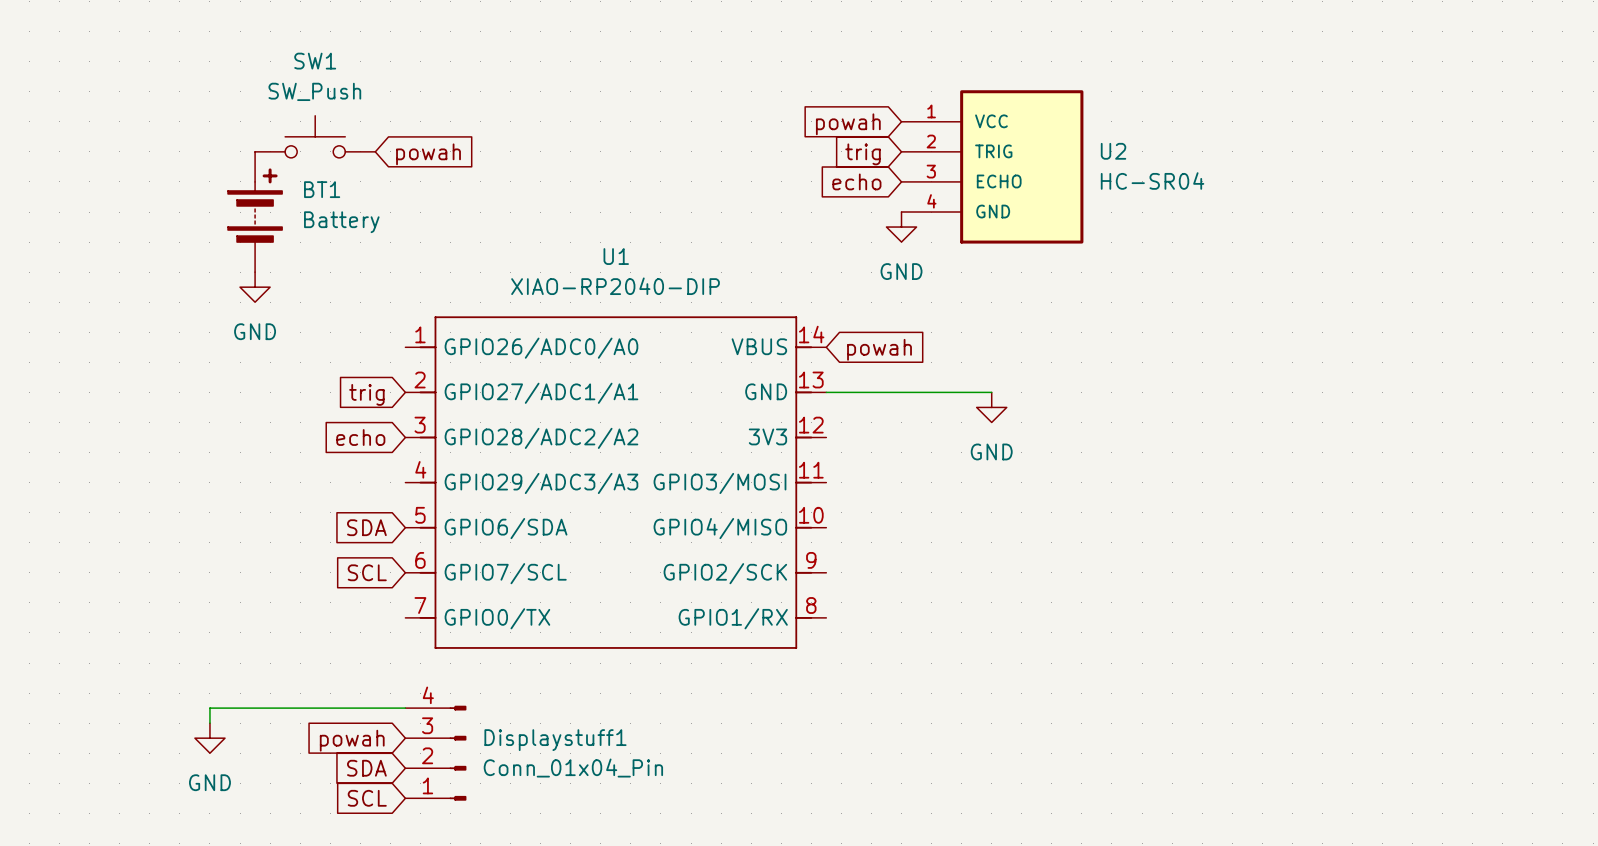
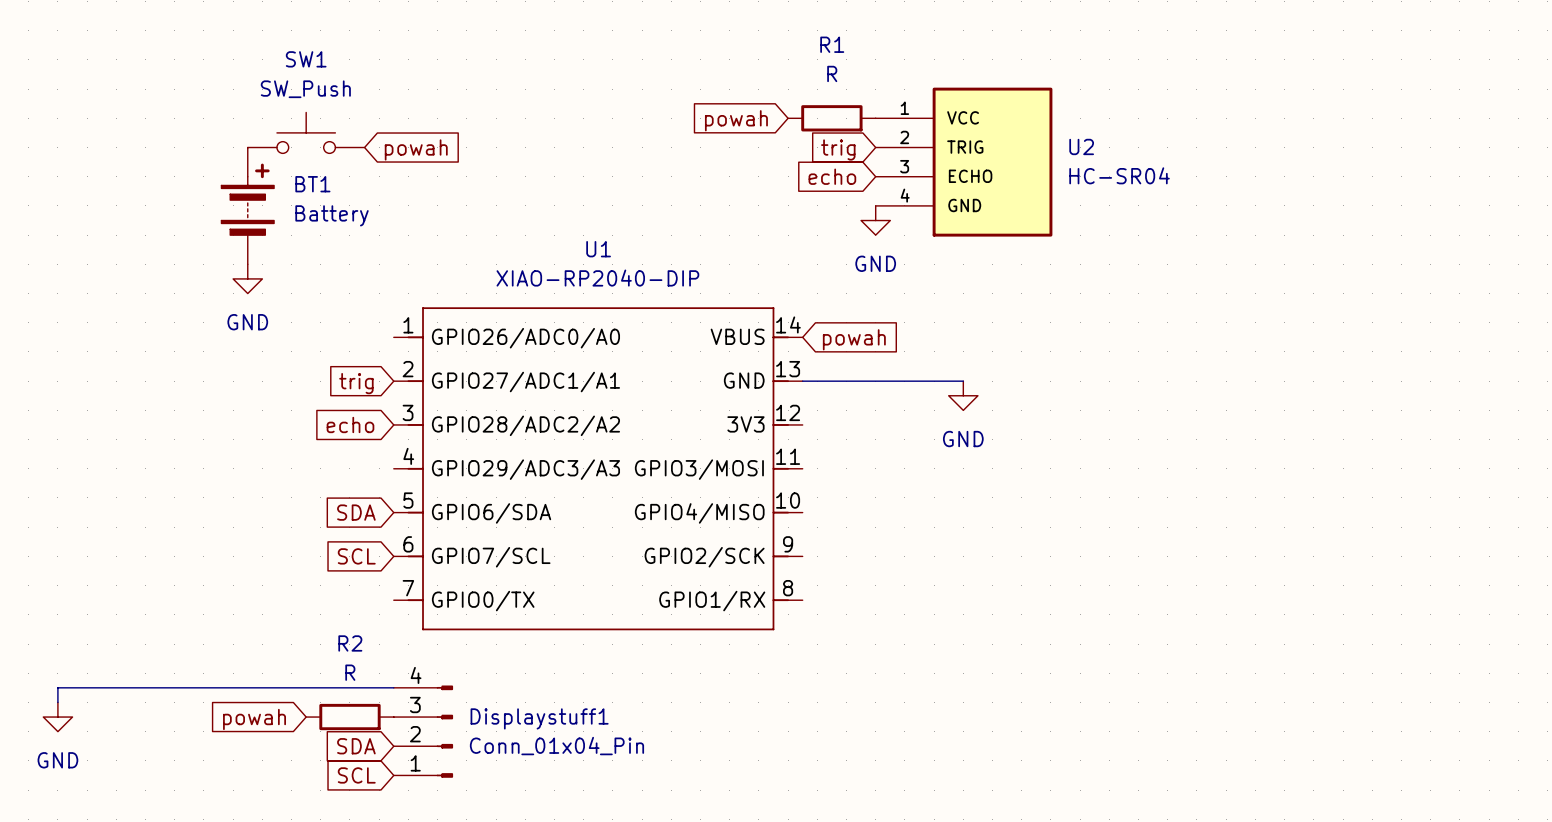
R1: none -> R (831, 118)
global label position: powah (848, 124) -> powah (736, 120)
wire: (209, 708) (209, 723) -> (203, 687) (57, 687) (57, 702)
power symbol position: GND (209, 738) -> GND (57, 717)
R2: none -> R (349, 717)
global label position: powah (352, 740) -> powah (254, 719)

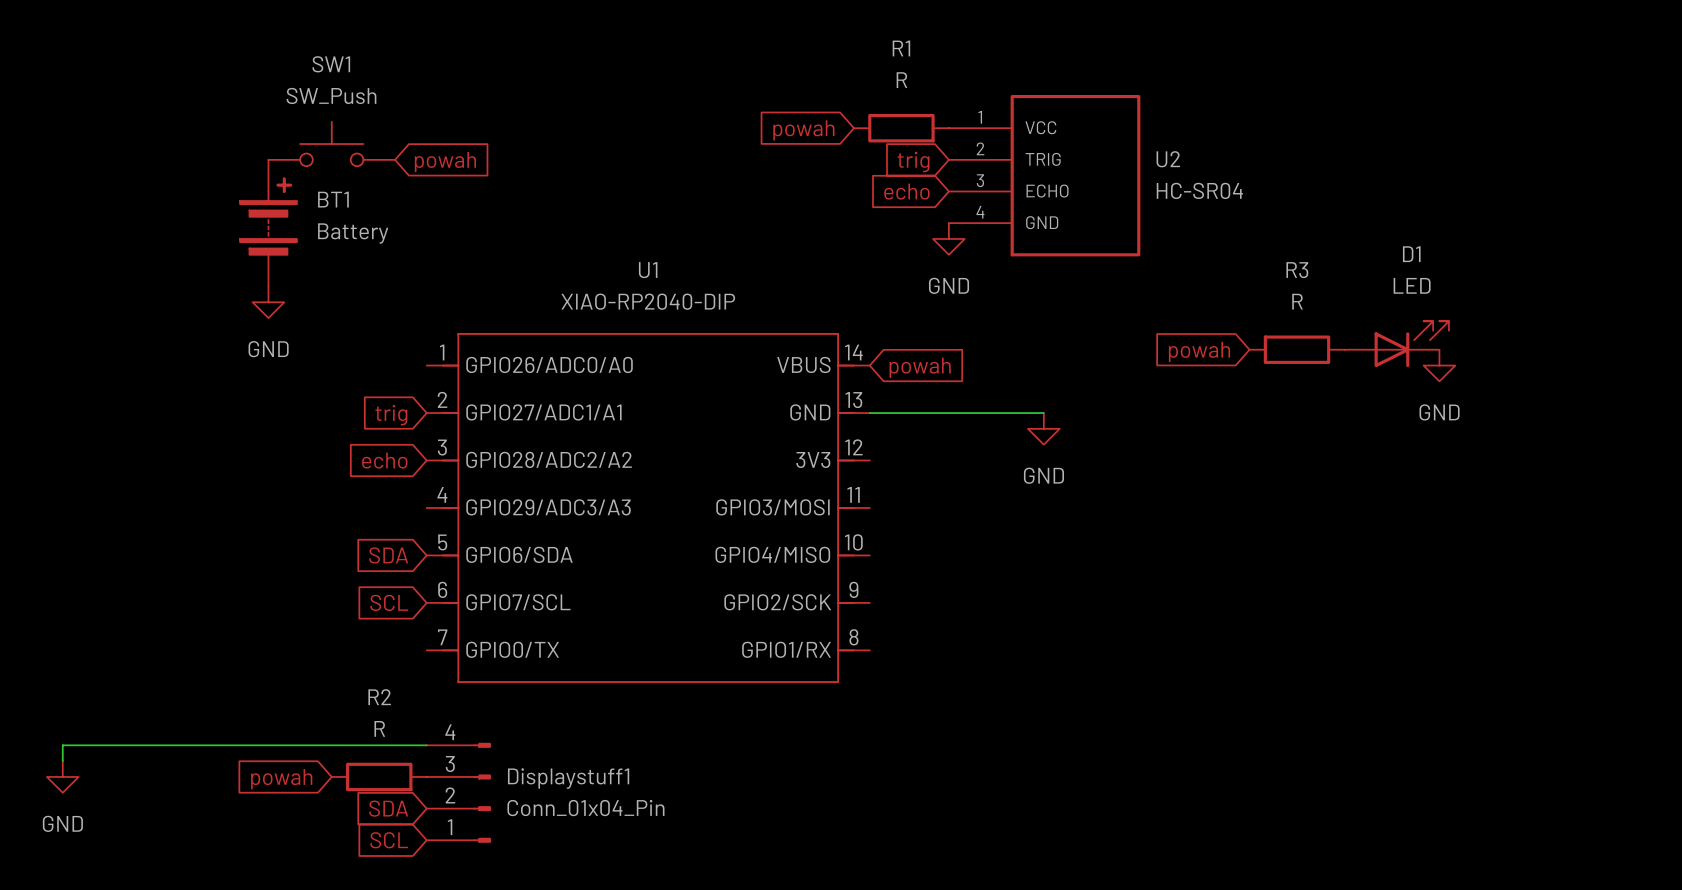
D1: none -> LED (1396, 344)
R3: none -> R (1297, 349)
global label: none -> powah (1199, 351)
power symbol: none -> GND (1439, 365)

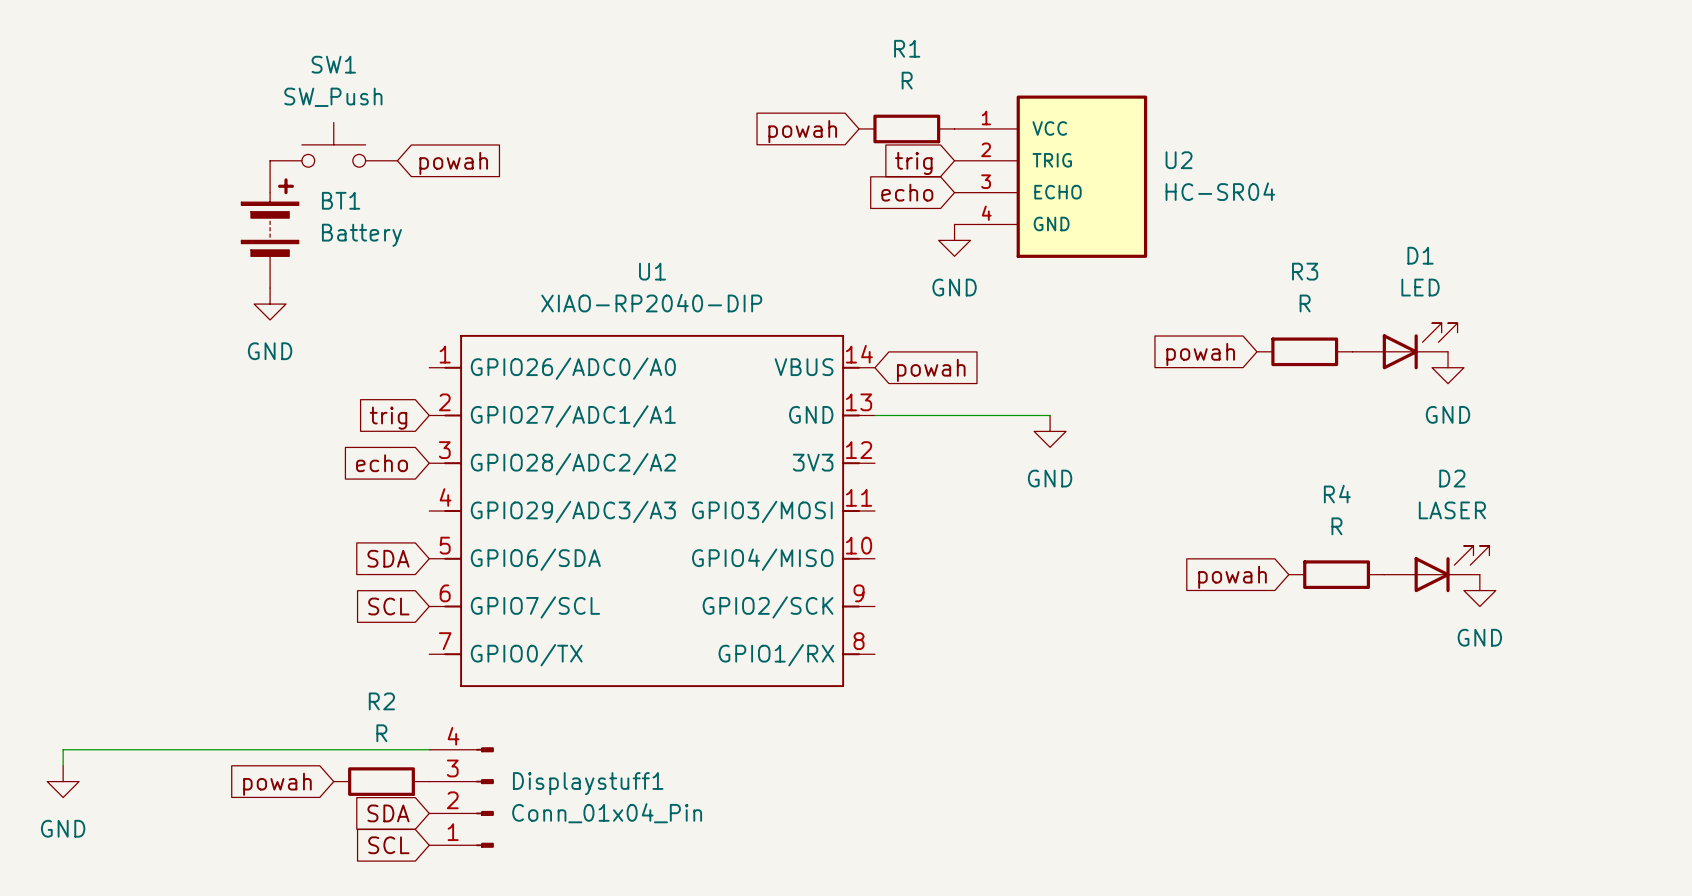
D2: none -> LASER (1436, 569)
R4: none -> R (1336, 574)
global label: none -> powah (1232, 577)
power symbol: none -> GND (1479, 590)

